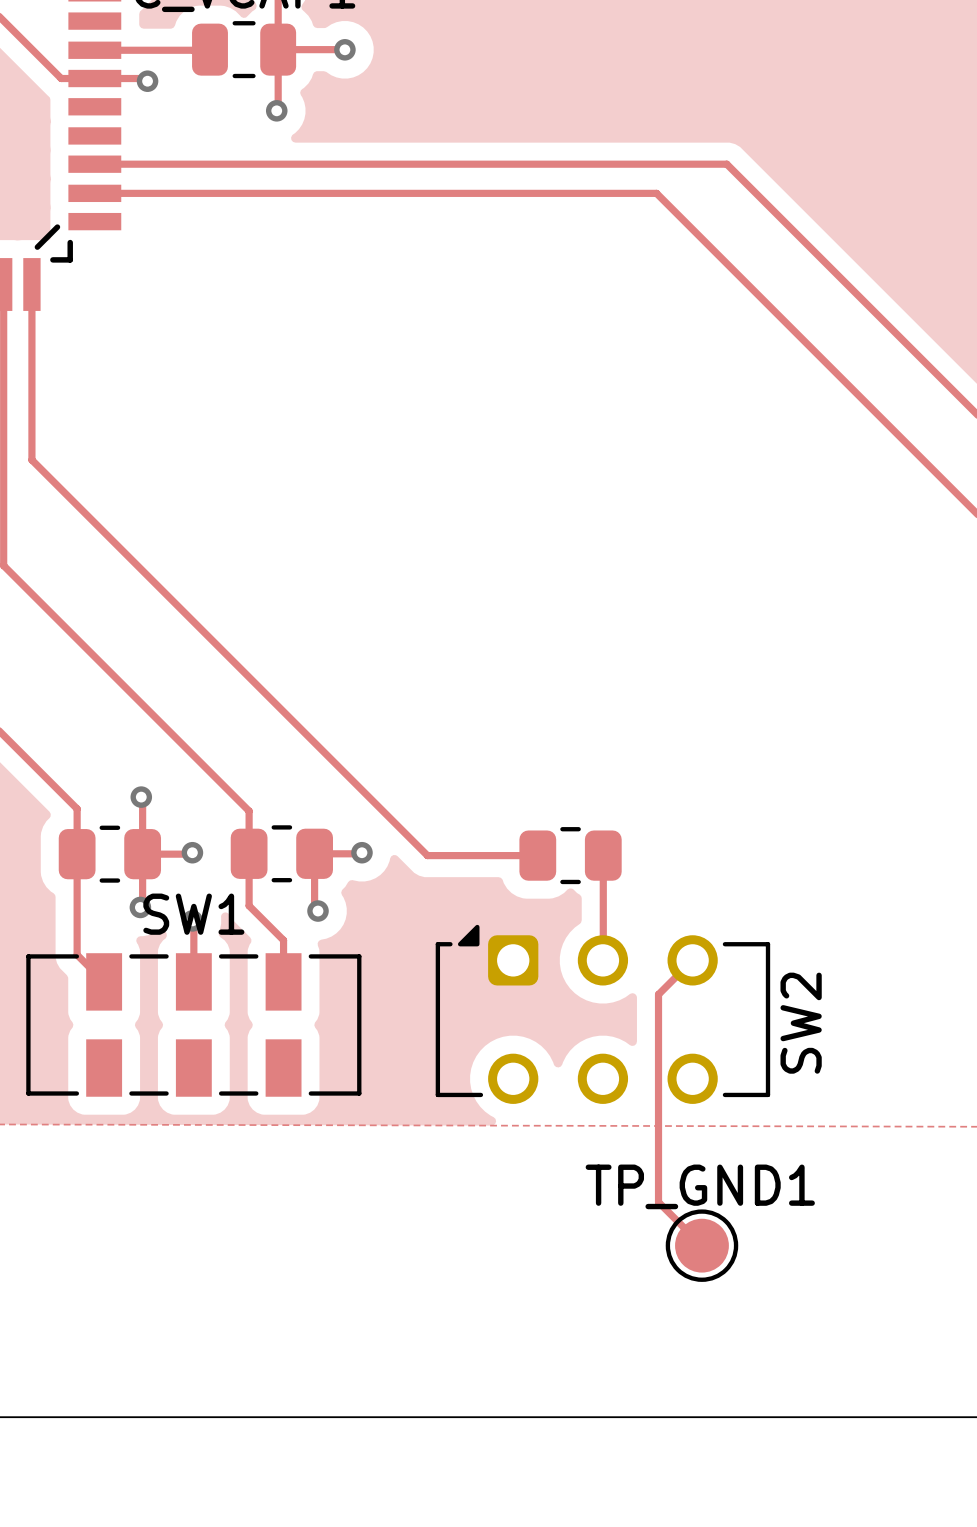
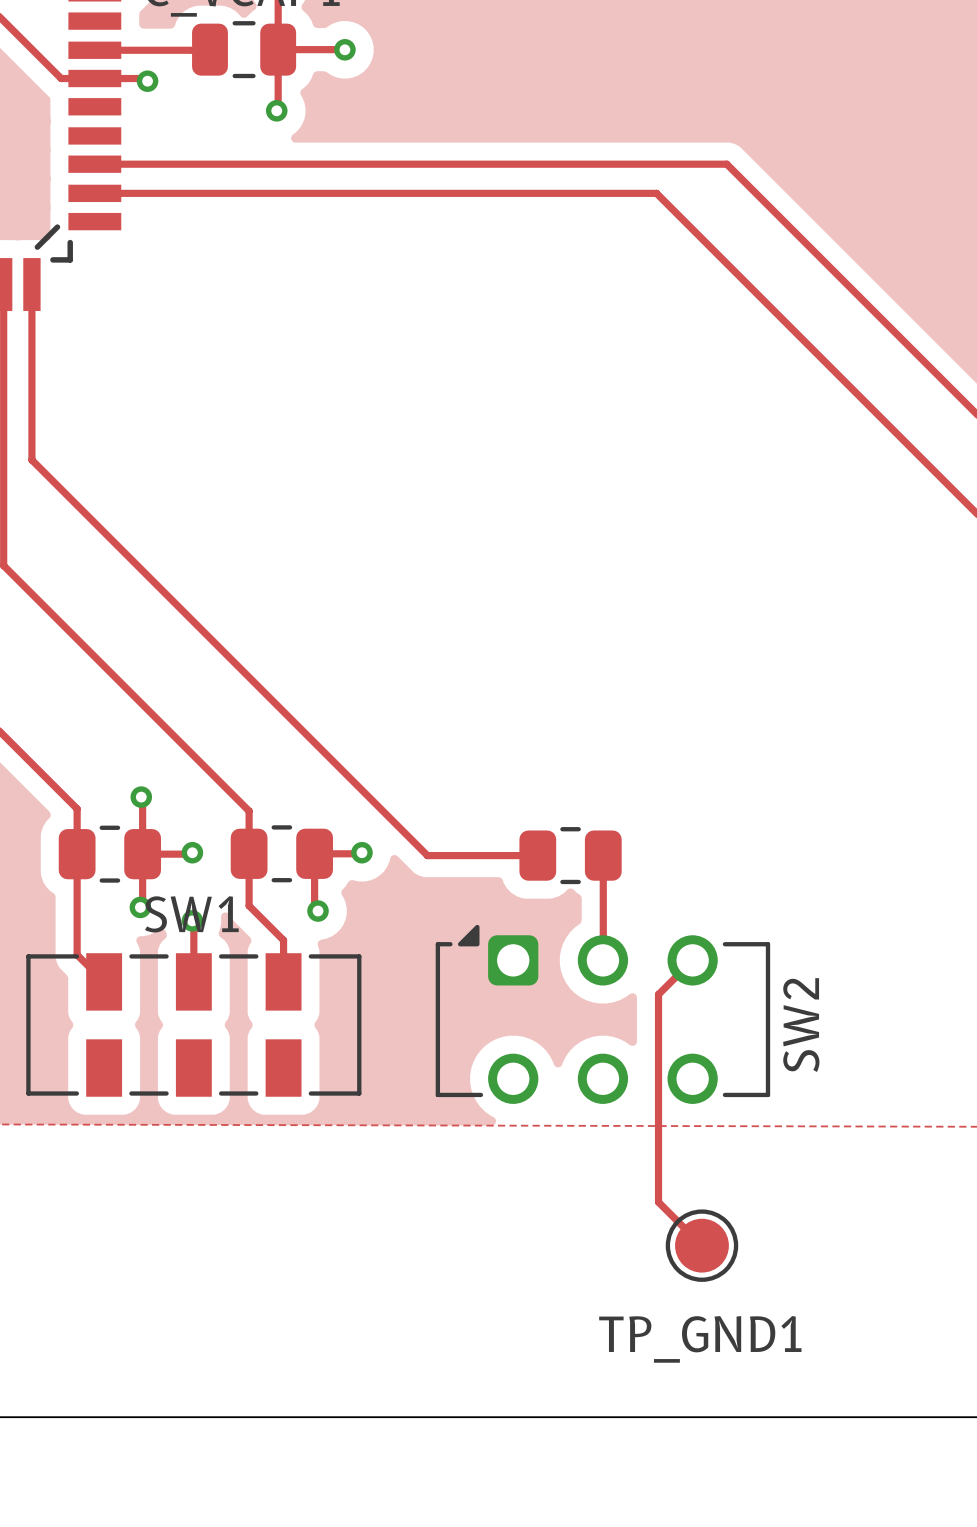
TP_GND1 name position: TP_GND1 (700, 1186) -> TP_GND1 (700, 1339)

